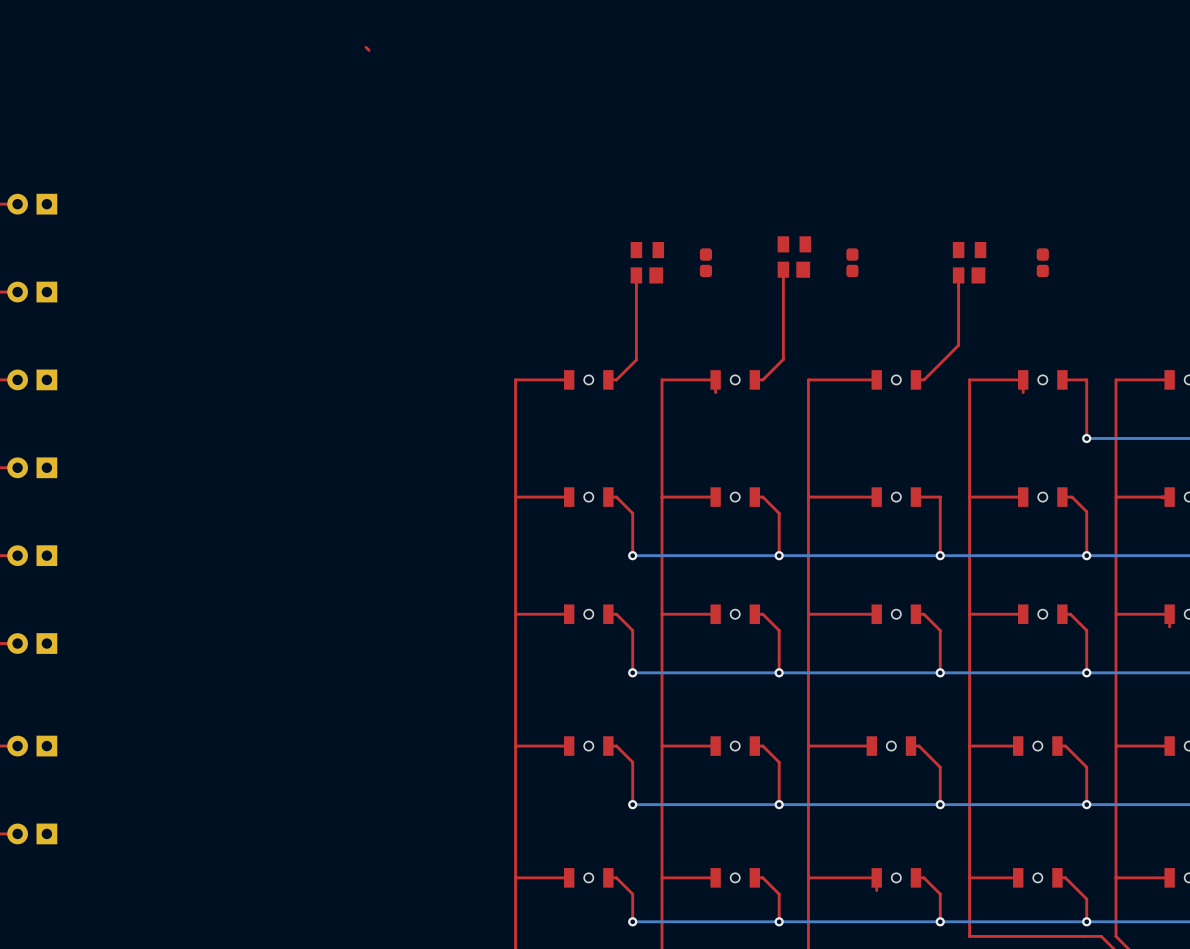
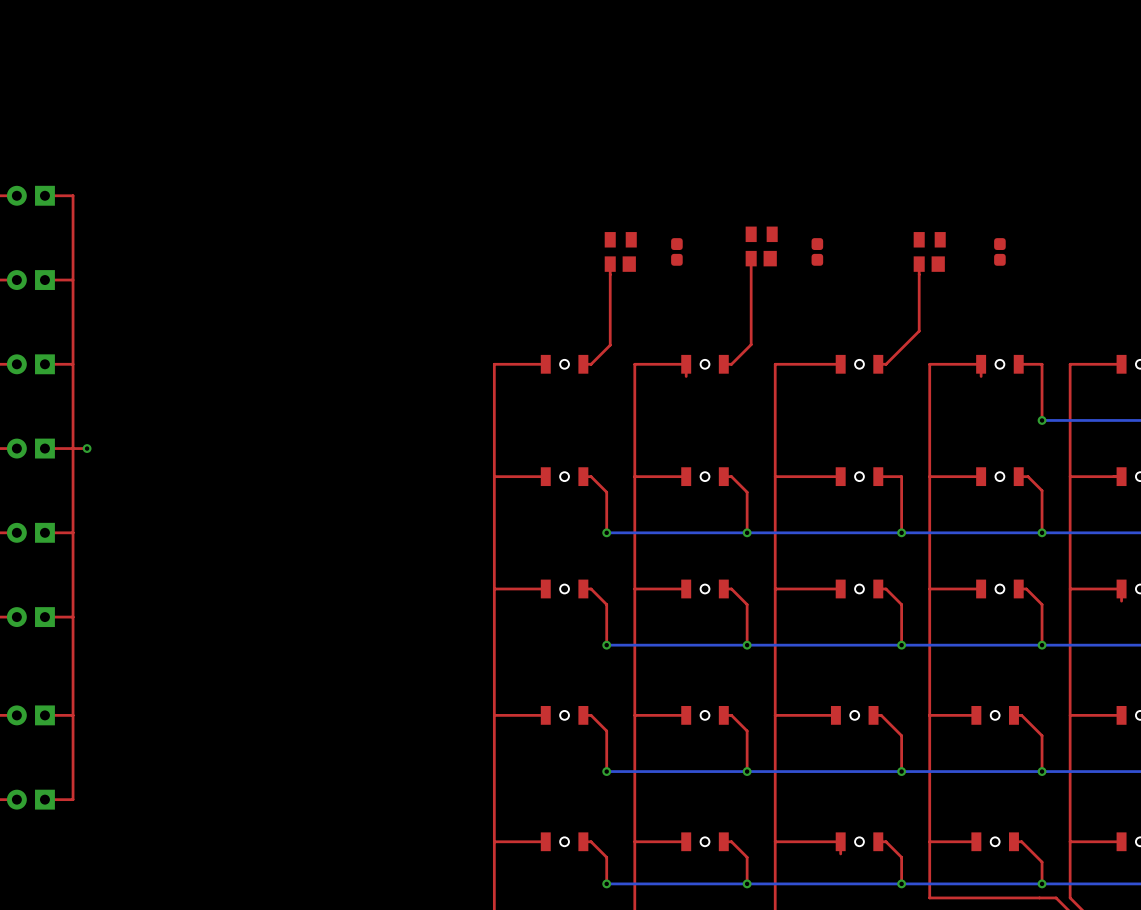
top track: (365, 47) (369, 50) -> none
top track: none -> (44, 195) (73, 195) (73, 799) (44, 799)
top track: none -> (73, 280) (44, 280)
top track: none -> (73, 364) (44, 364)
top track: none -> (87, 448) (44, 448)
via: none -> (87, 448)
top track: none -> (73, 532) (44, 532)
top track: none -> (73, 617) (44, 617)
top track: none -> (73, 715) (44, 715)

